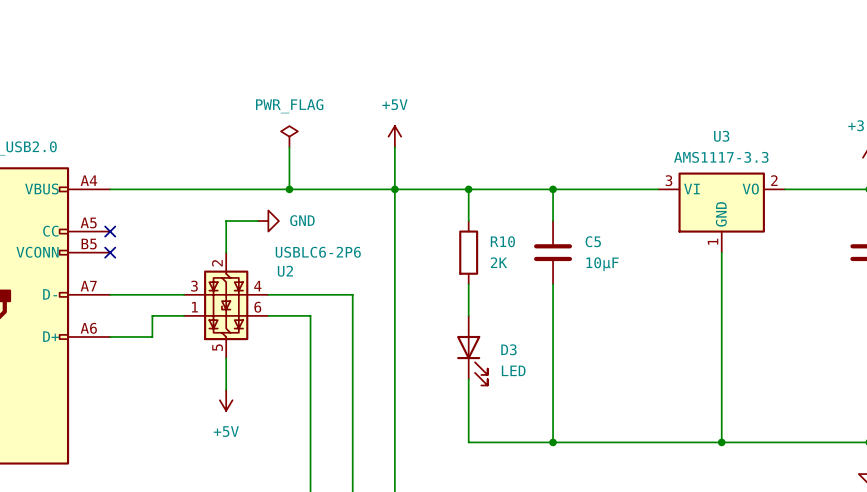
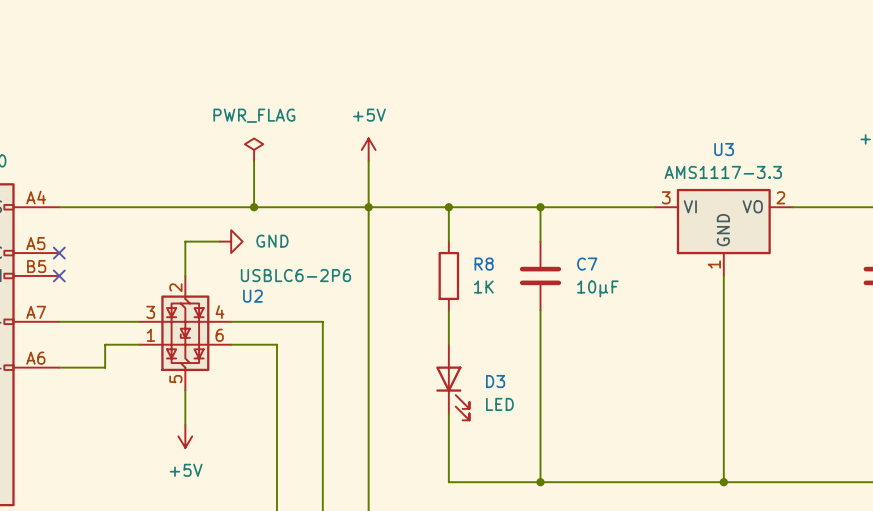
R10 name: R10 (502, 241) -> R8 (484, 264)
C5 name: C5 (593, 241) -> C7 (587, 264)
R10 value: 2K (498, 262) -> 1K (483, 287)

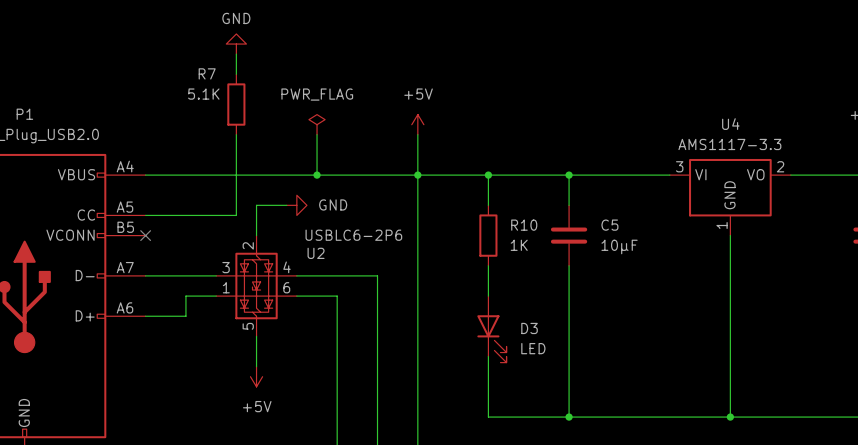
power symbol: none -> GND (236, 44)
wire: none -> (236, 54) (236, 74)
R7: none -> 5.1K (236, 104)
U3 name: U3 (724, 149) -> U4 (730, 124)
wire: none -> (236, 134) (236, 215) (145, 215)
no-connect mark: (59, 253) -> none
R8 name: R8 (484, 264) -> R10 (524, 225)
C7 name: C7 (587, 264) -> C5 (609, 225)

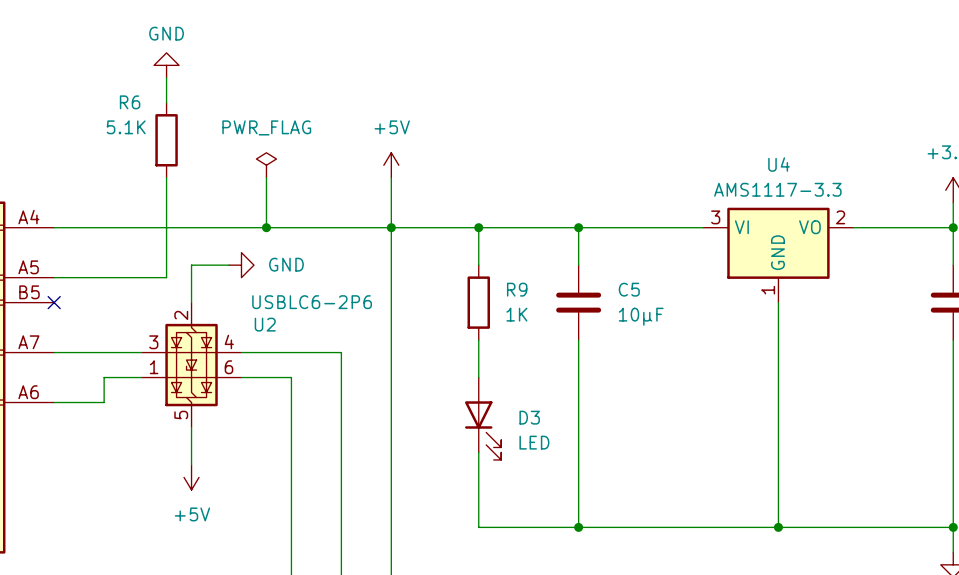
R7 name: R7 (207, 73) -> R6 (130, 102)
R10 name: R10 (524, 225) -> R9 (517, 289)

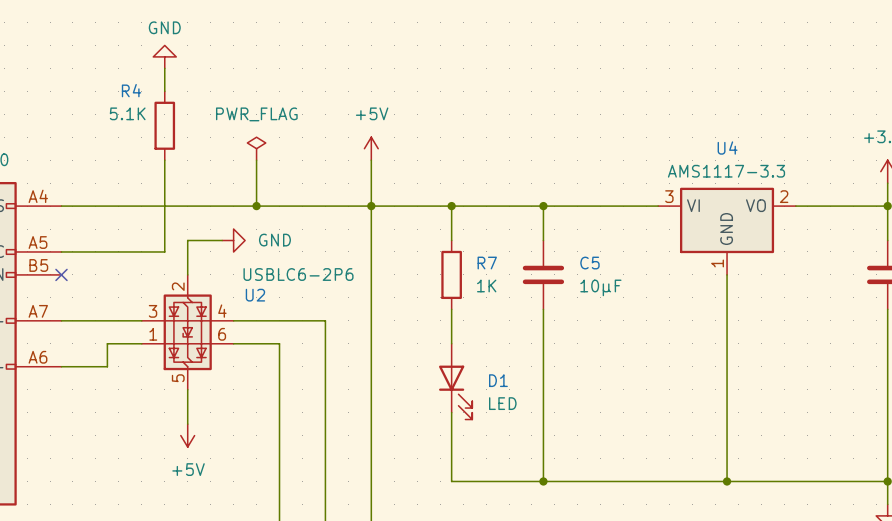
R6 name: R6 (130, 102) -> R4 (131, 90)
R9 name: R9 (517, 289) -> R7 (487, 263)
D3 name: D3 (529, 417) -> D1 (498, 380)

